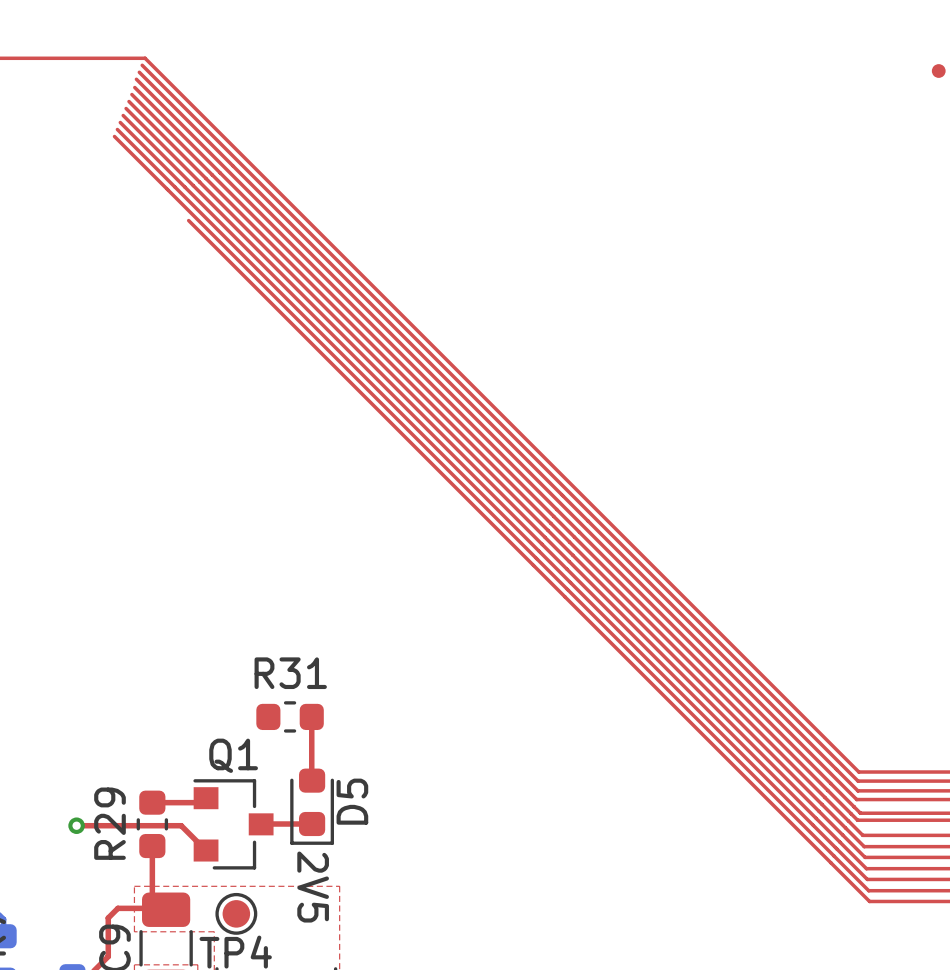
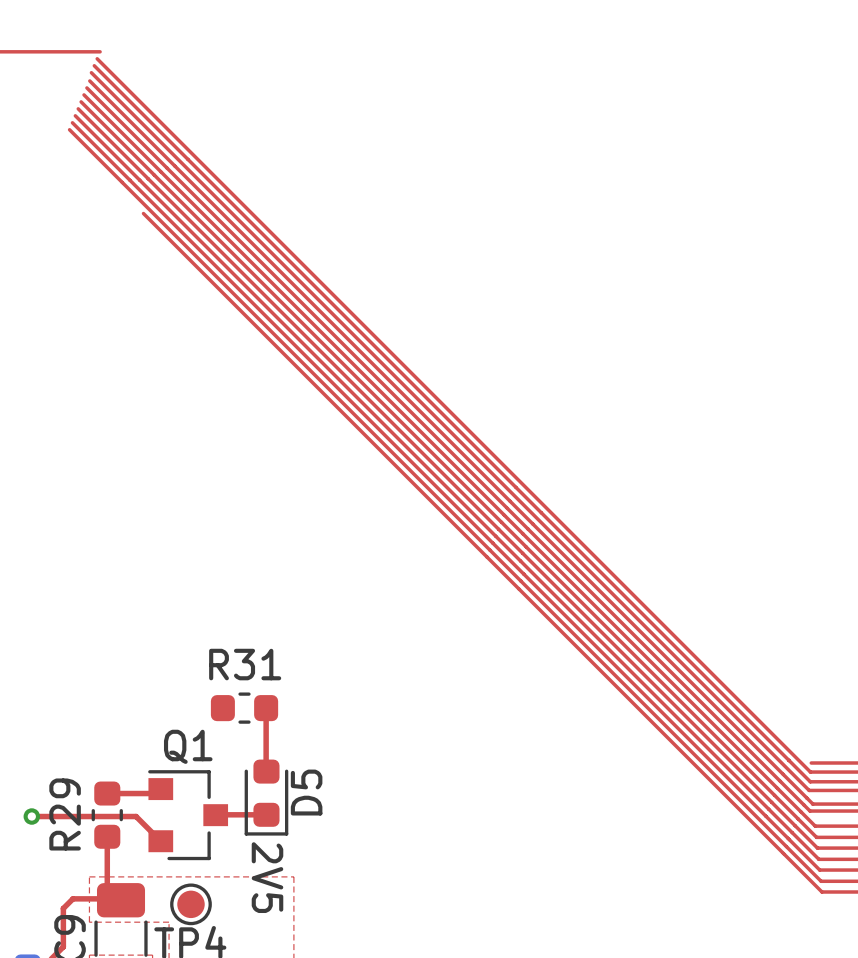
top track: (145, 58) (858, 772) -> none

